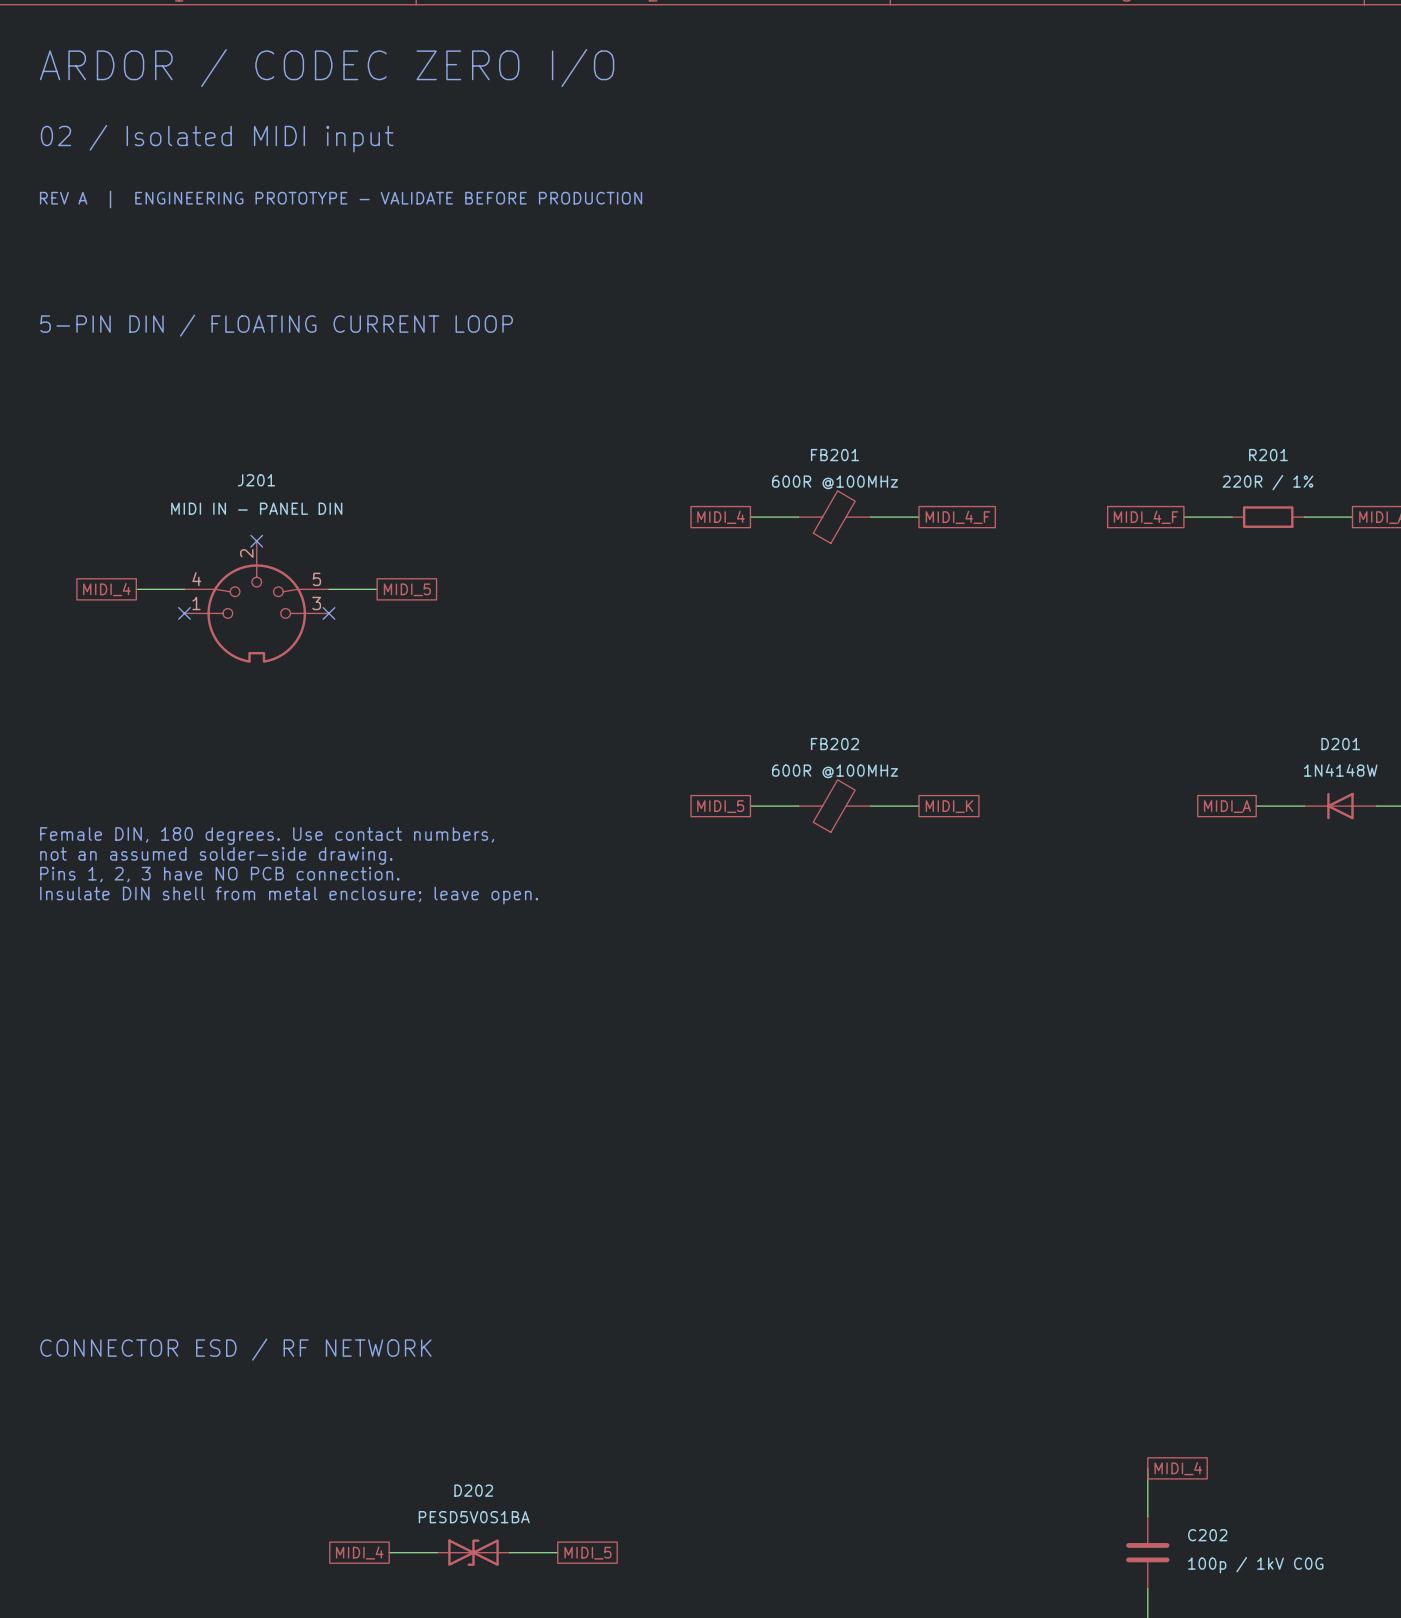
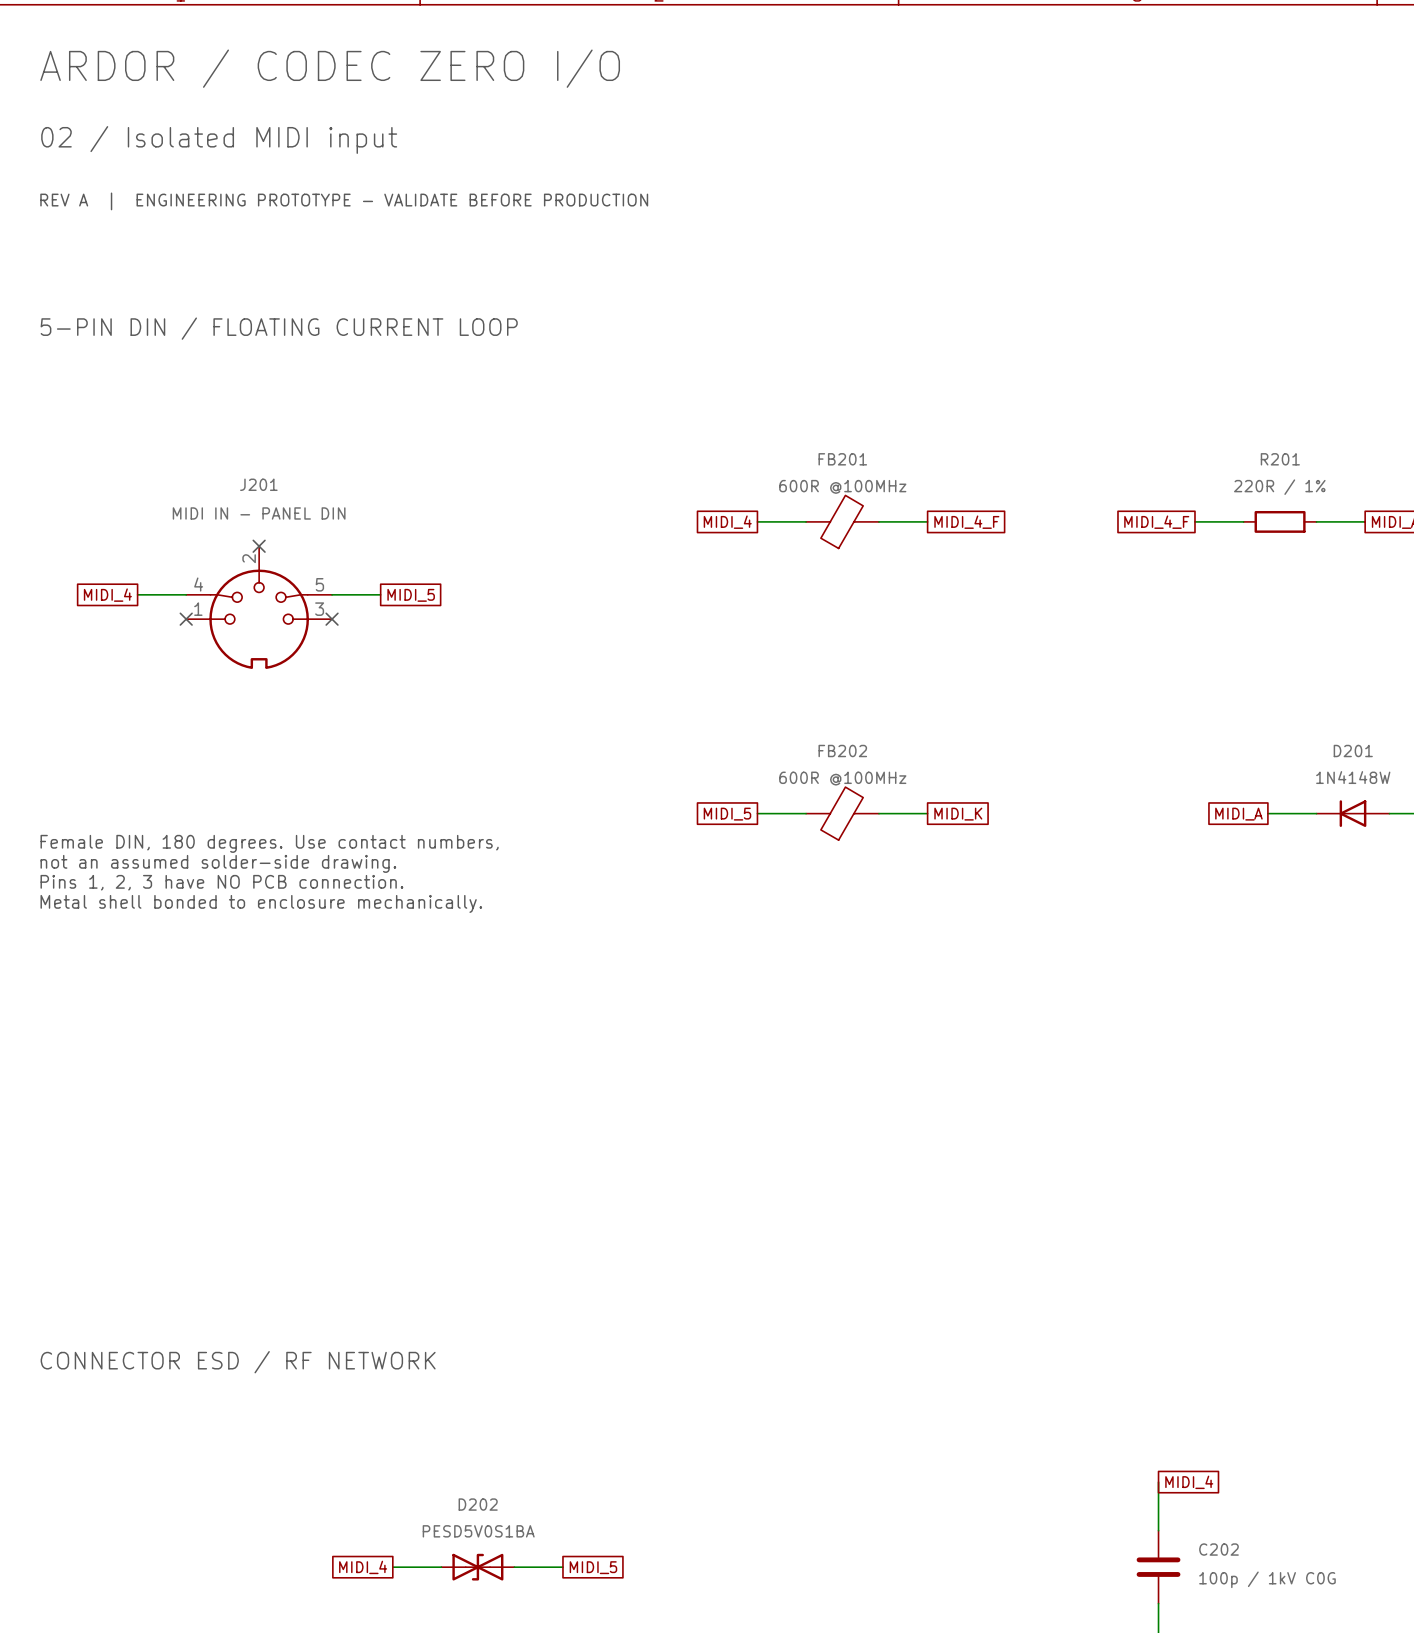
text: Insulate DIN shell from metal enclosure; leave open. (289, 895) -> Metal shell bonded to enclosure mechanically. (261, 903)

